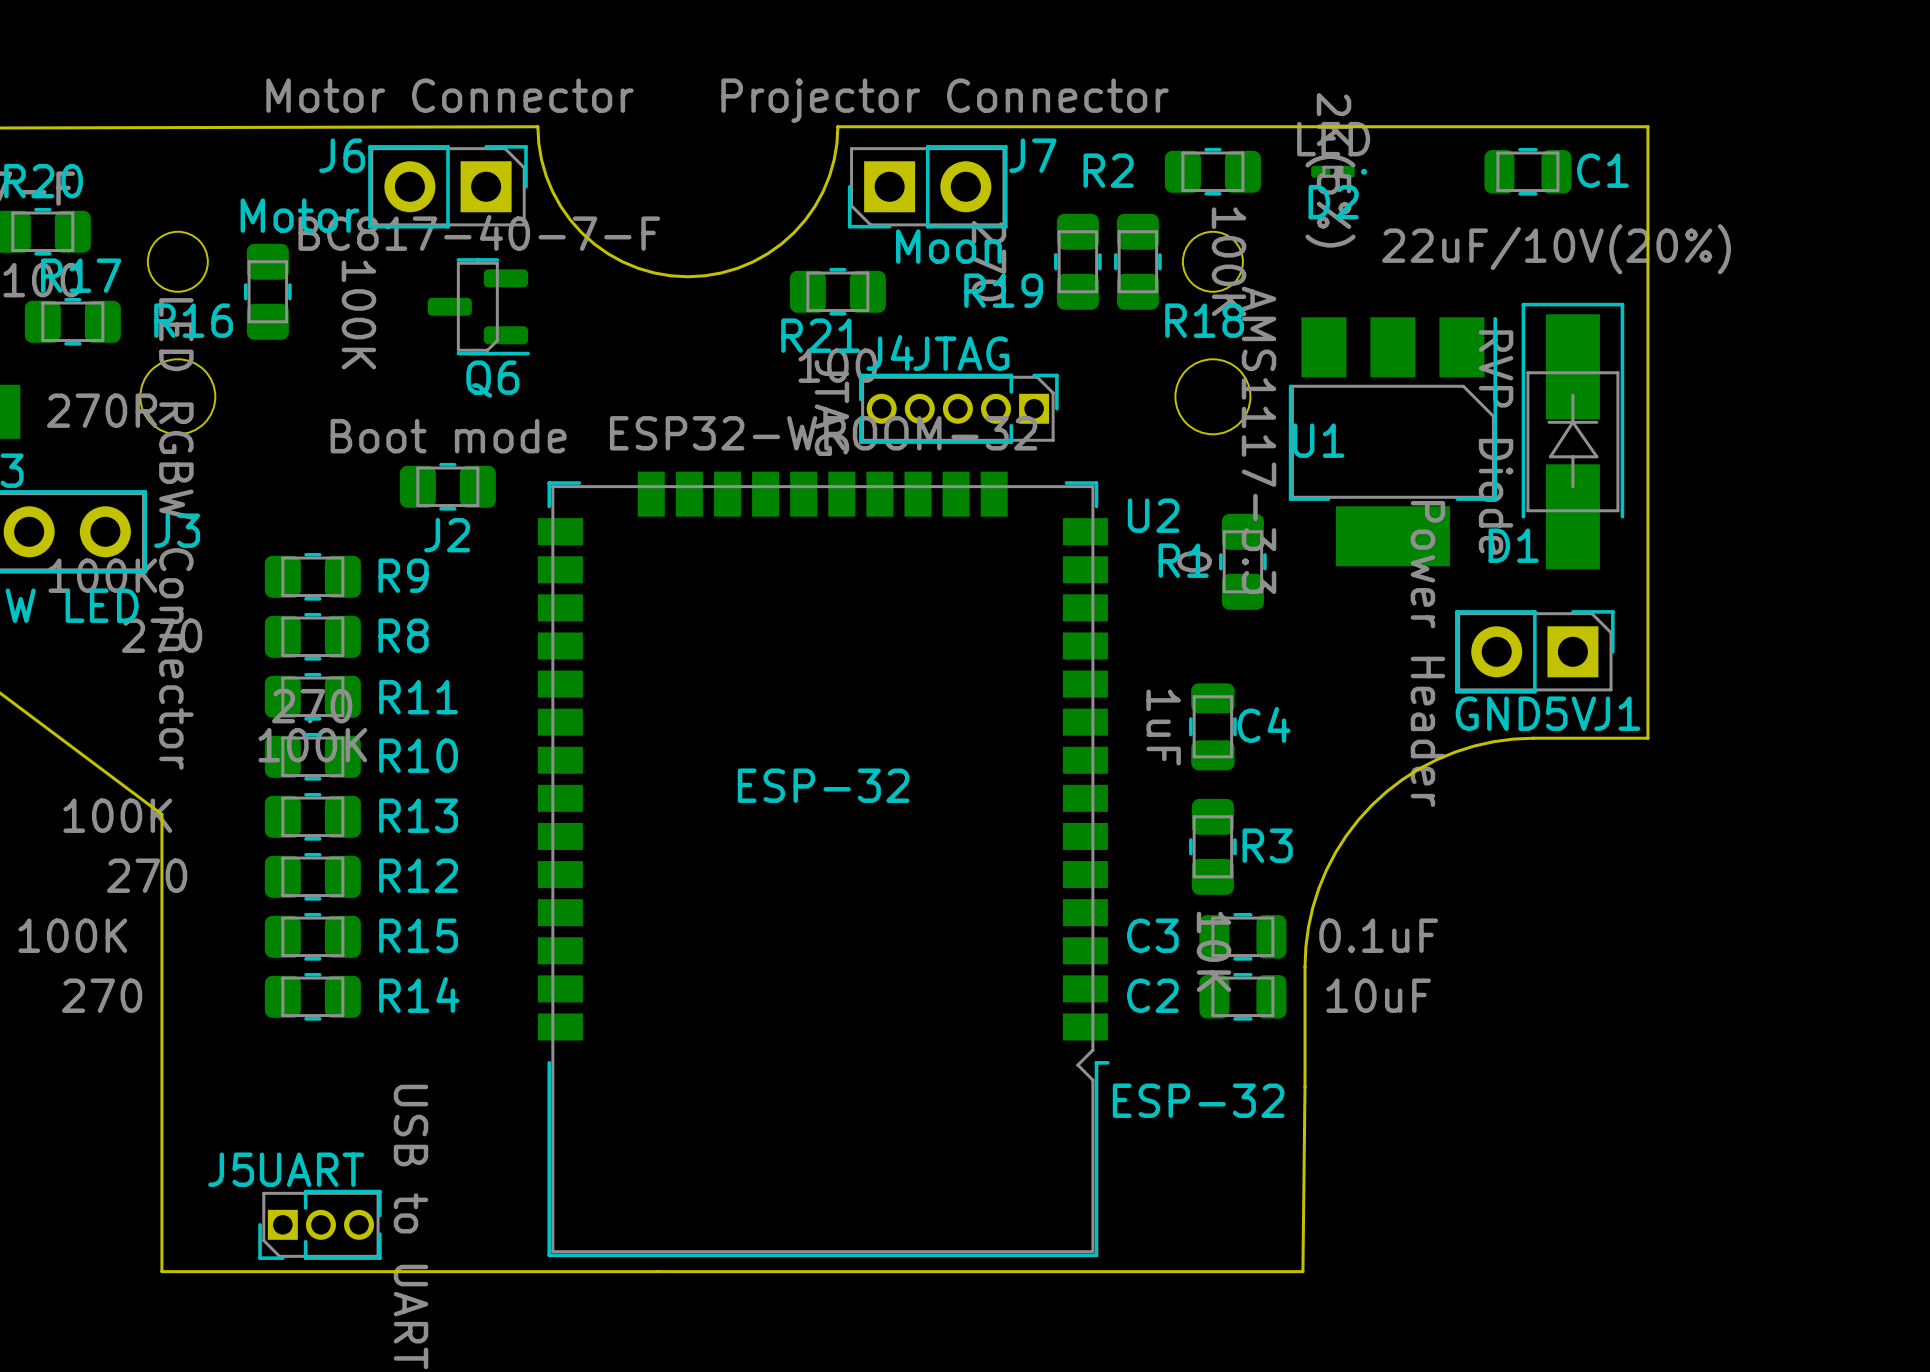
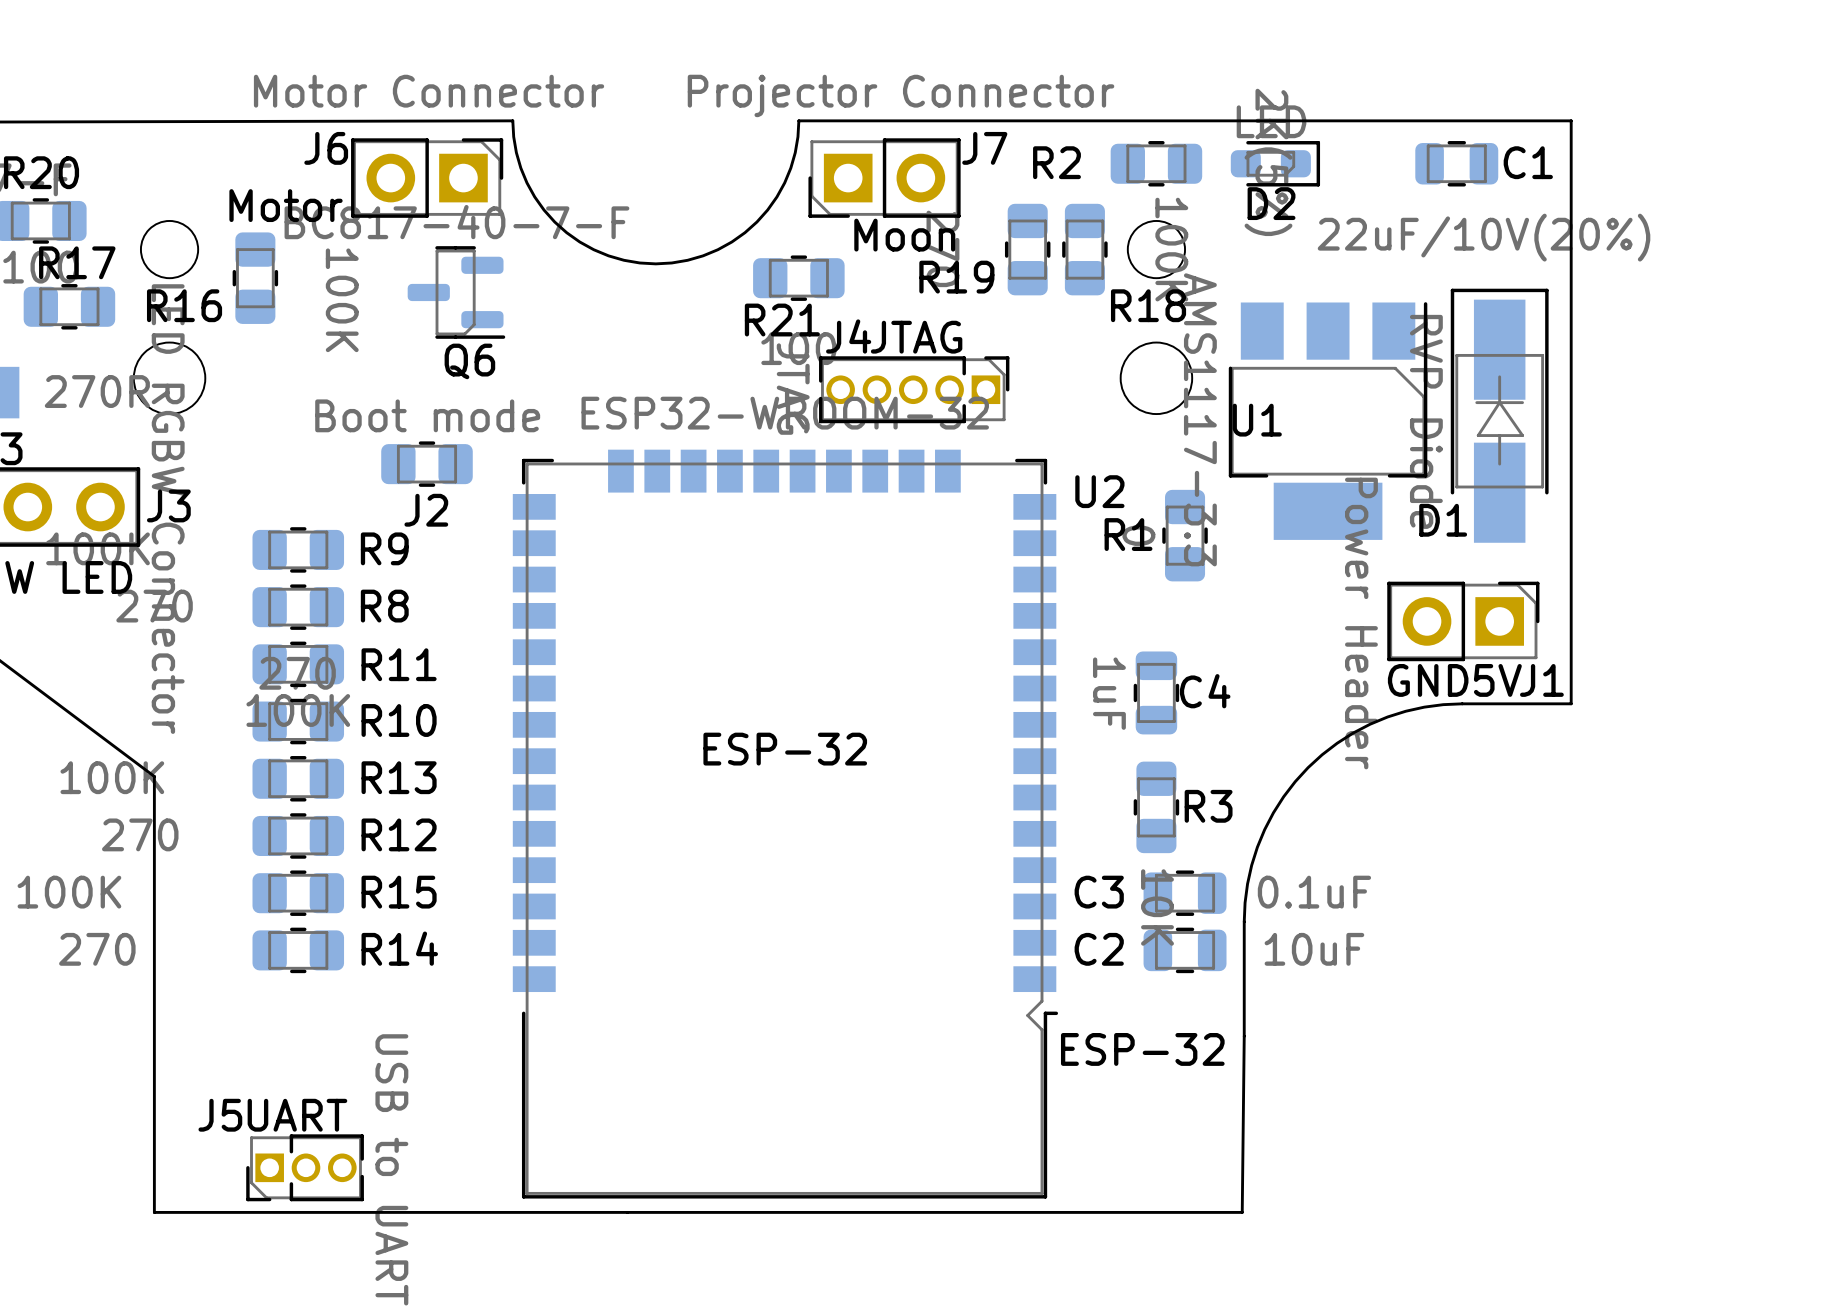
D2 footprint: [1311, 165, 1367, 178] -> [1230, 141, 1321, 187]

